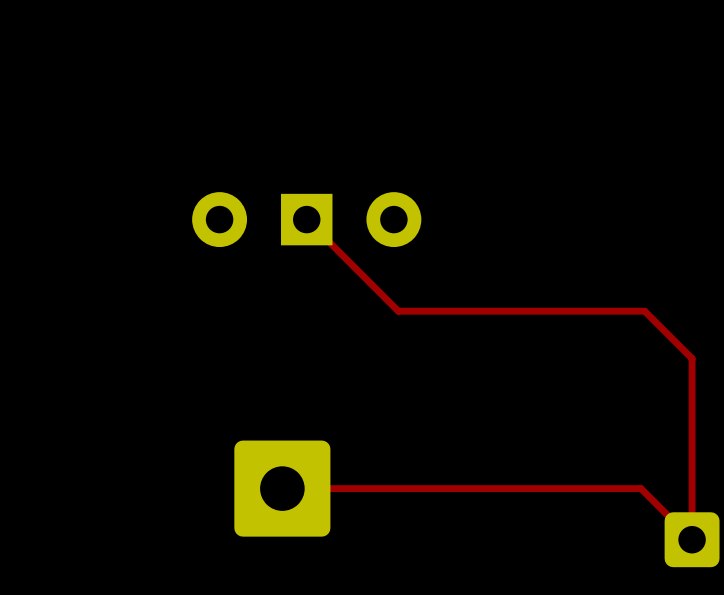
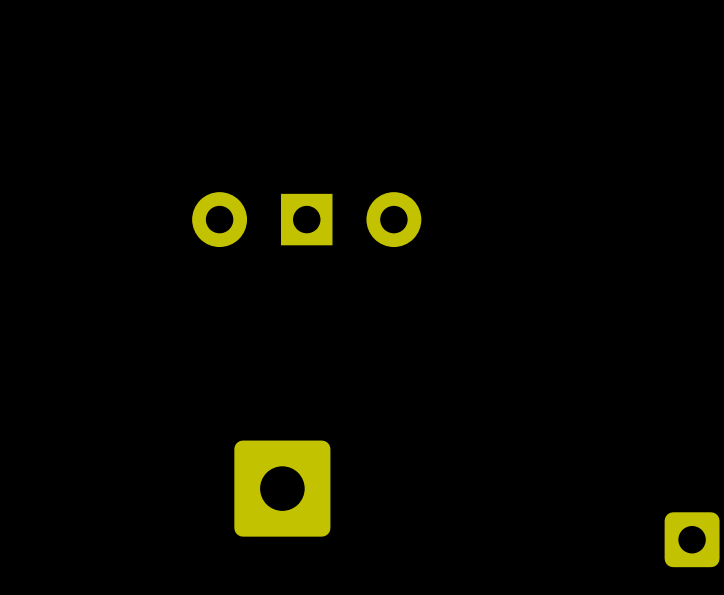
top track: (306, 219) (398, 311) (644, 311) (692, 358) (692, 539) (640, 488) (282, 488) -> none

